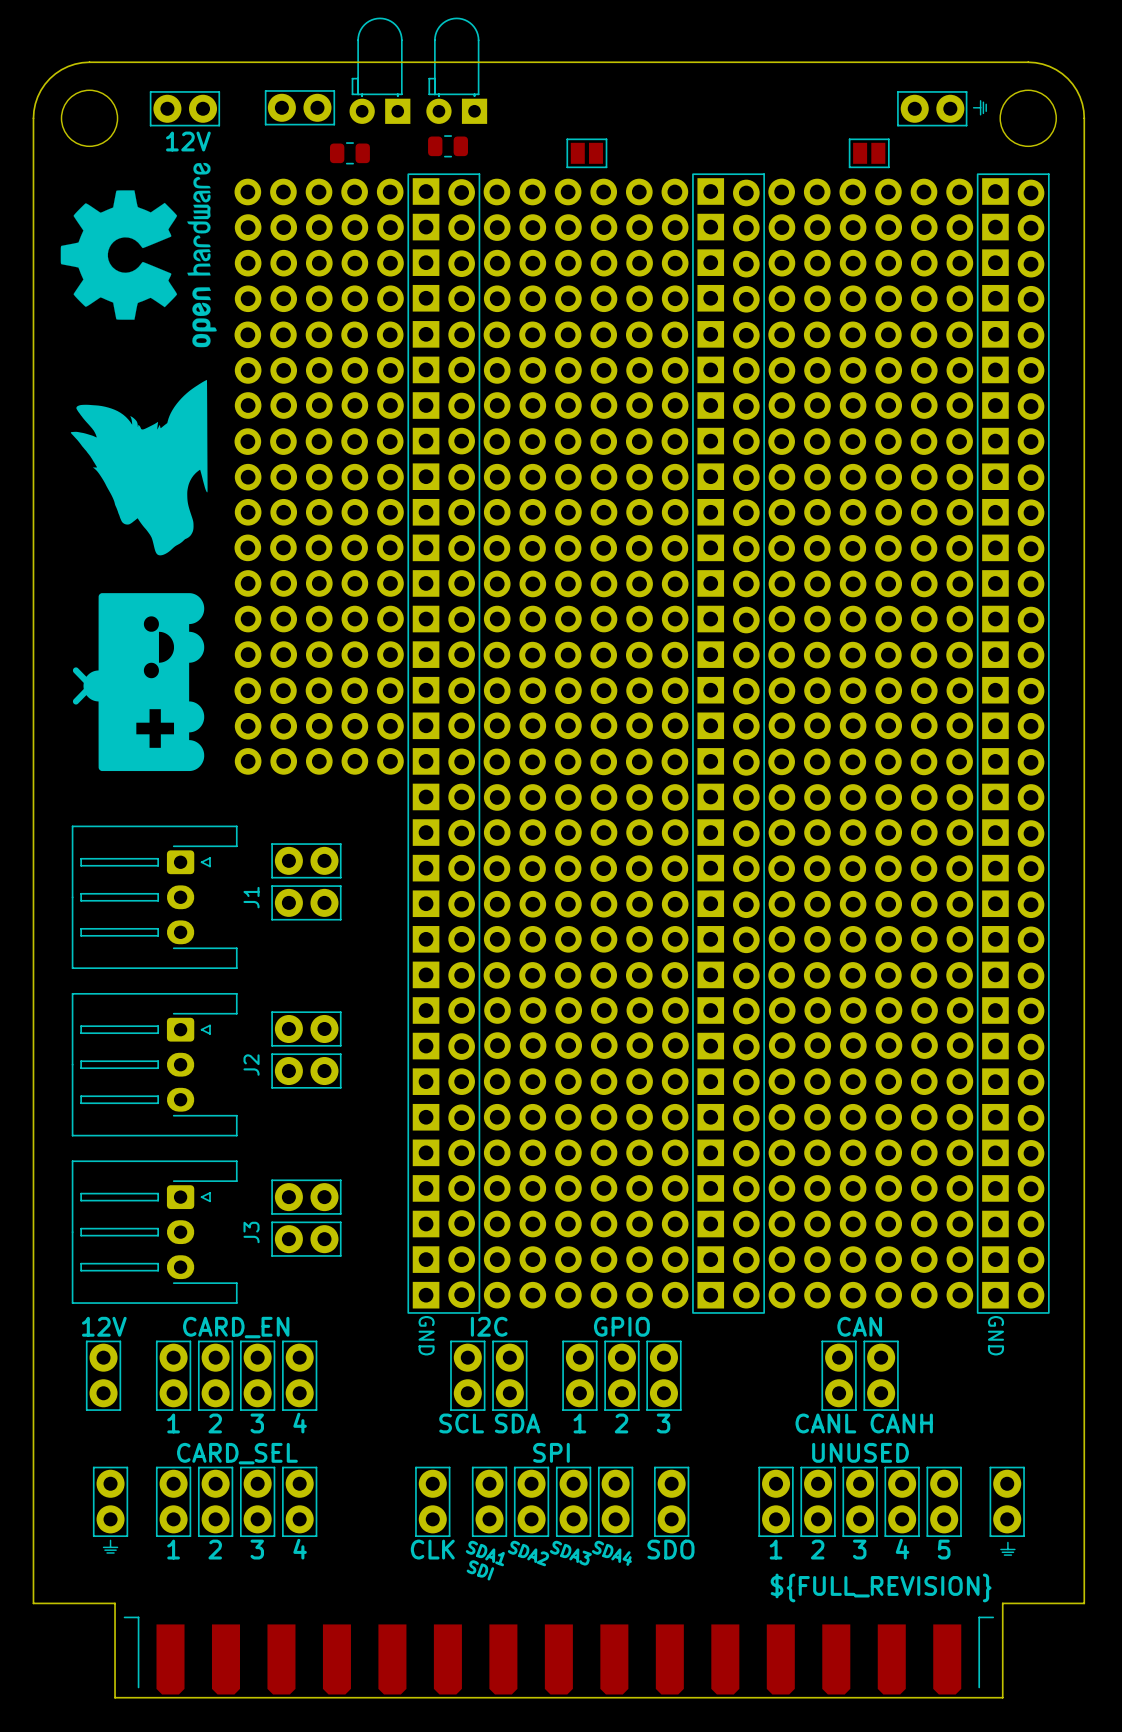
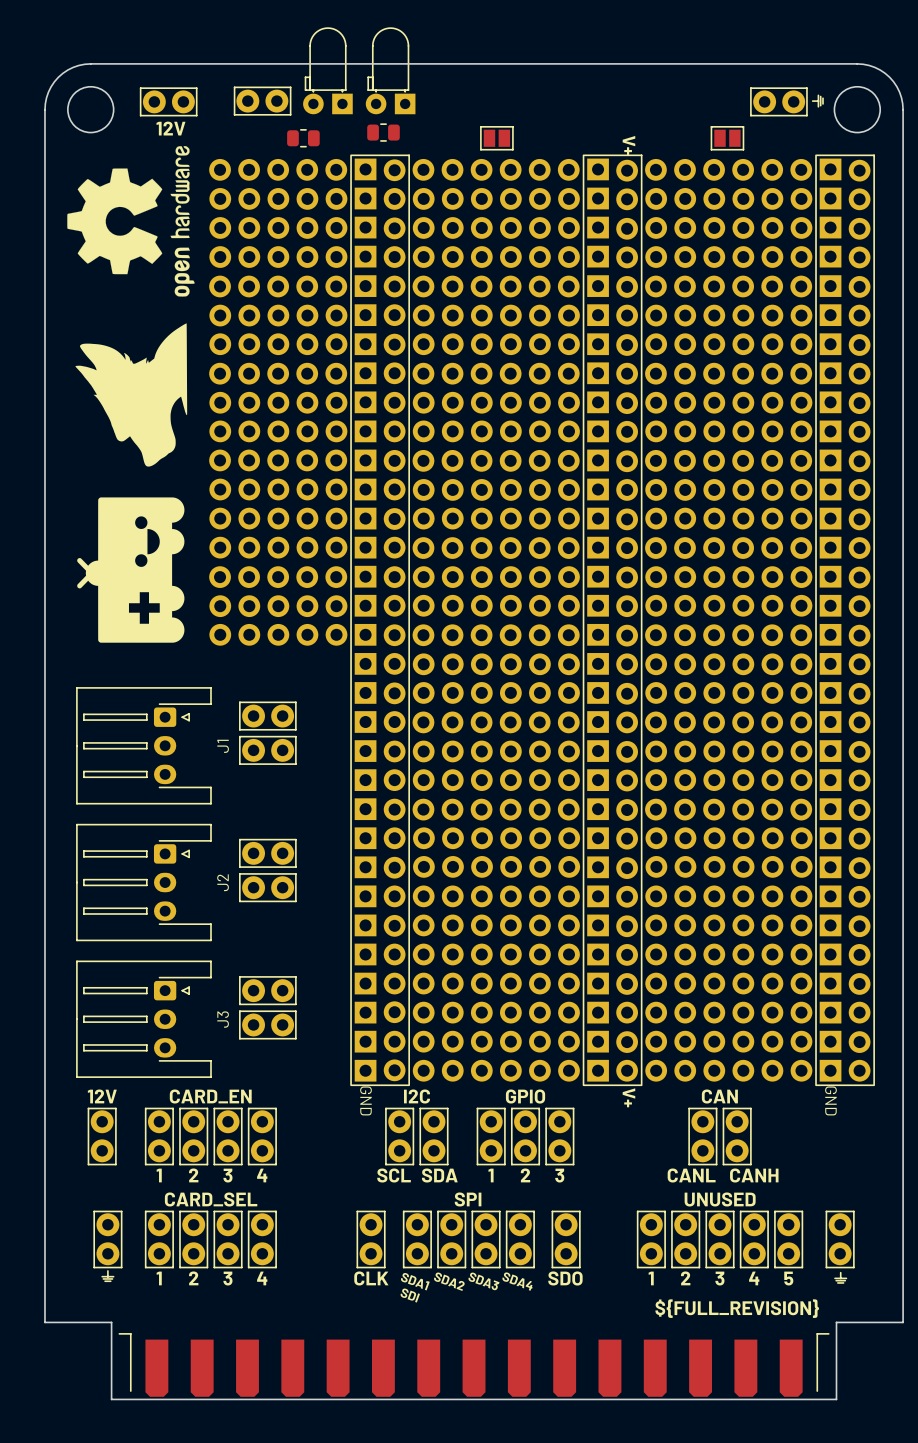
text: none -> V+ (628, 145)
text: none -> V+ (628, 1097)

